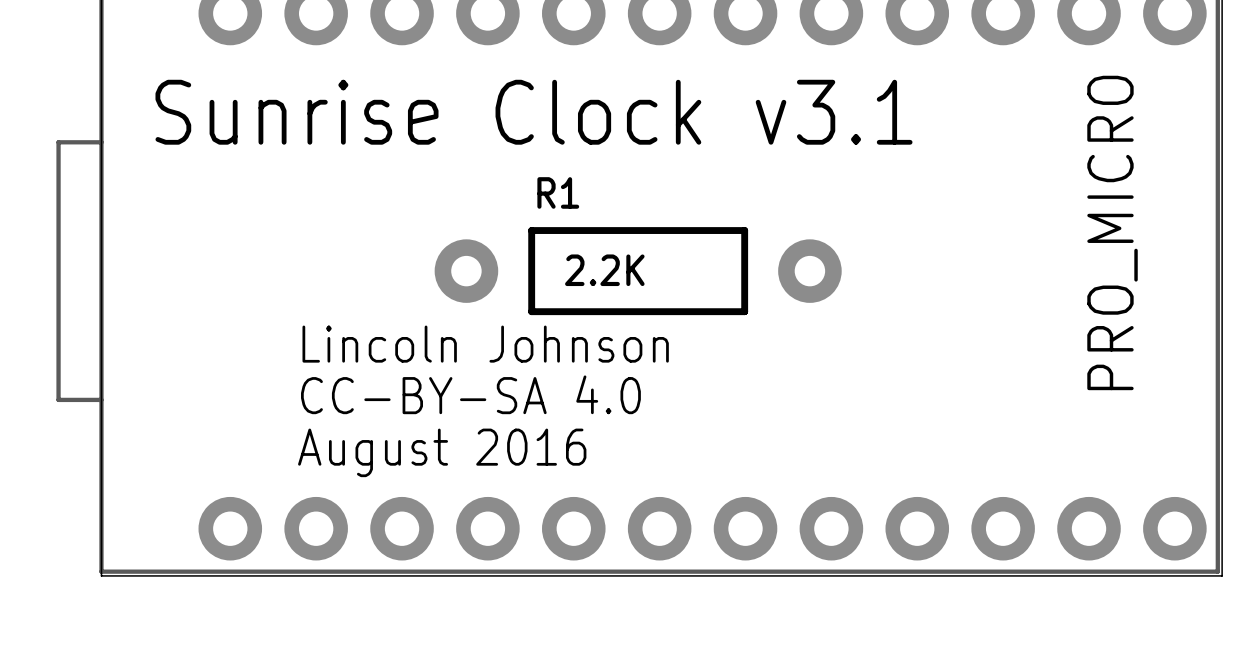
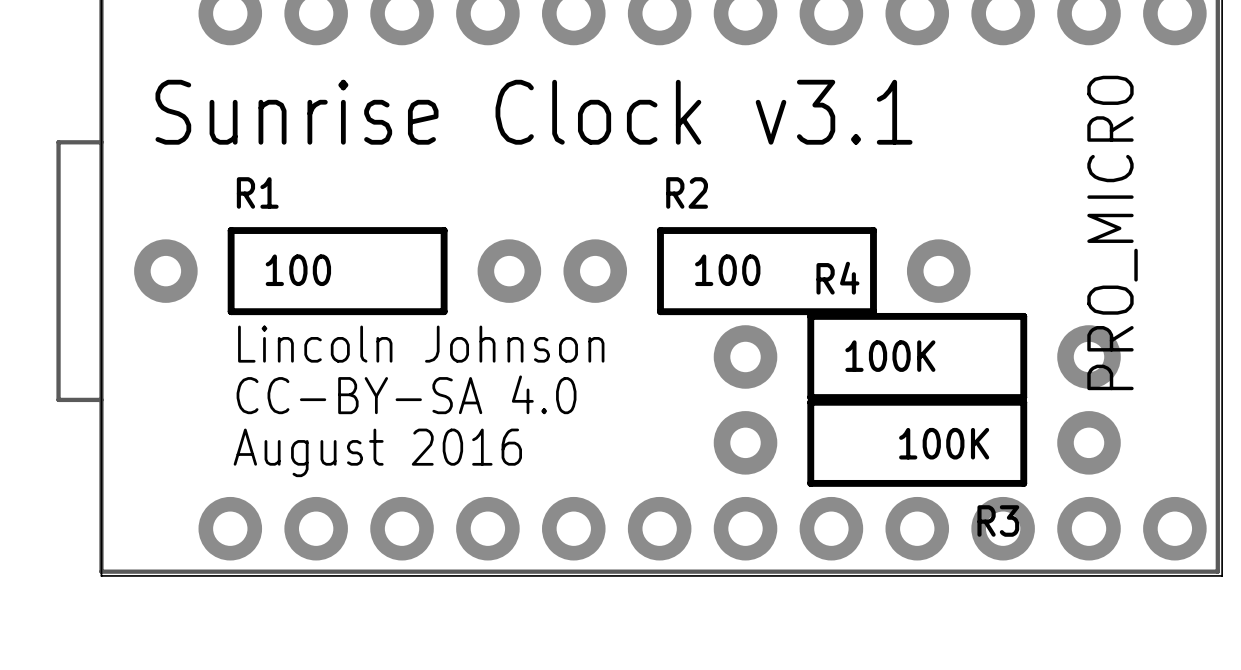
R1 value: 2.2K (604, 270) -> 100 (298, 270)
R1 position: (638, 271) -> (337, 271)
R2: none -> 100 (766, 271)
text position: Lincoln Johnson (485, 344) -> Lincoln Johnson (421, 344)
R4: none -> 100K (917, 356)
text position: CC-BY-SA 4.0 (470, 394) -> CC-BY-SA 4.0 (406, 394)
R3: none -> 100K (917, 442)
text position: August 2016 (442, 452) -> August 2016 (377, 452)

